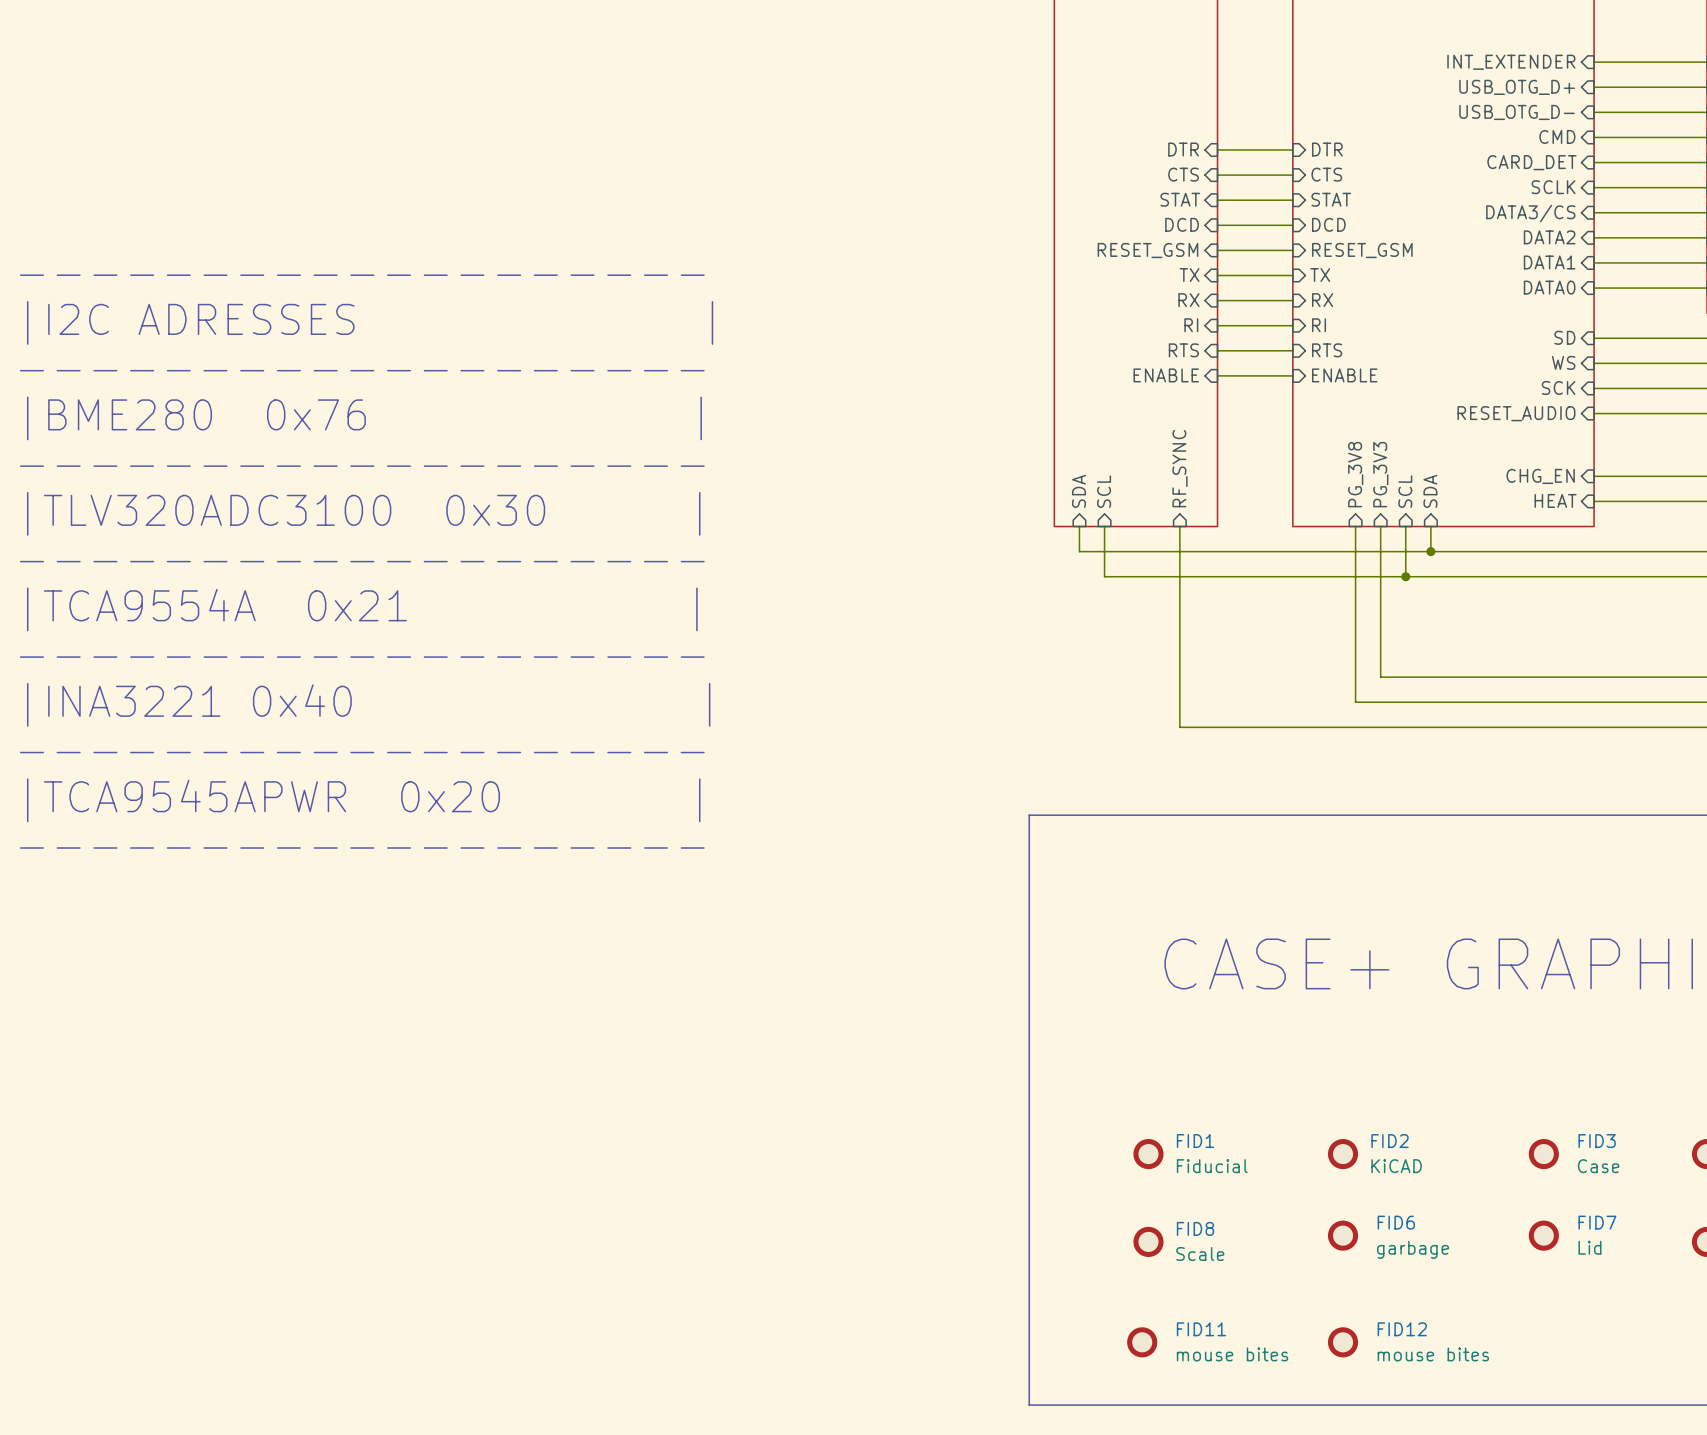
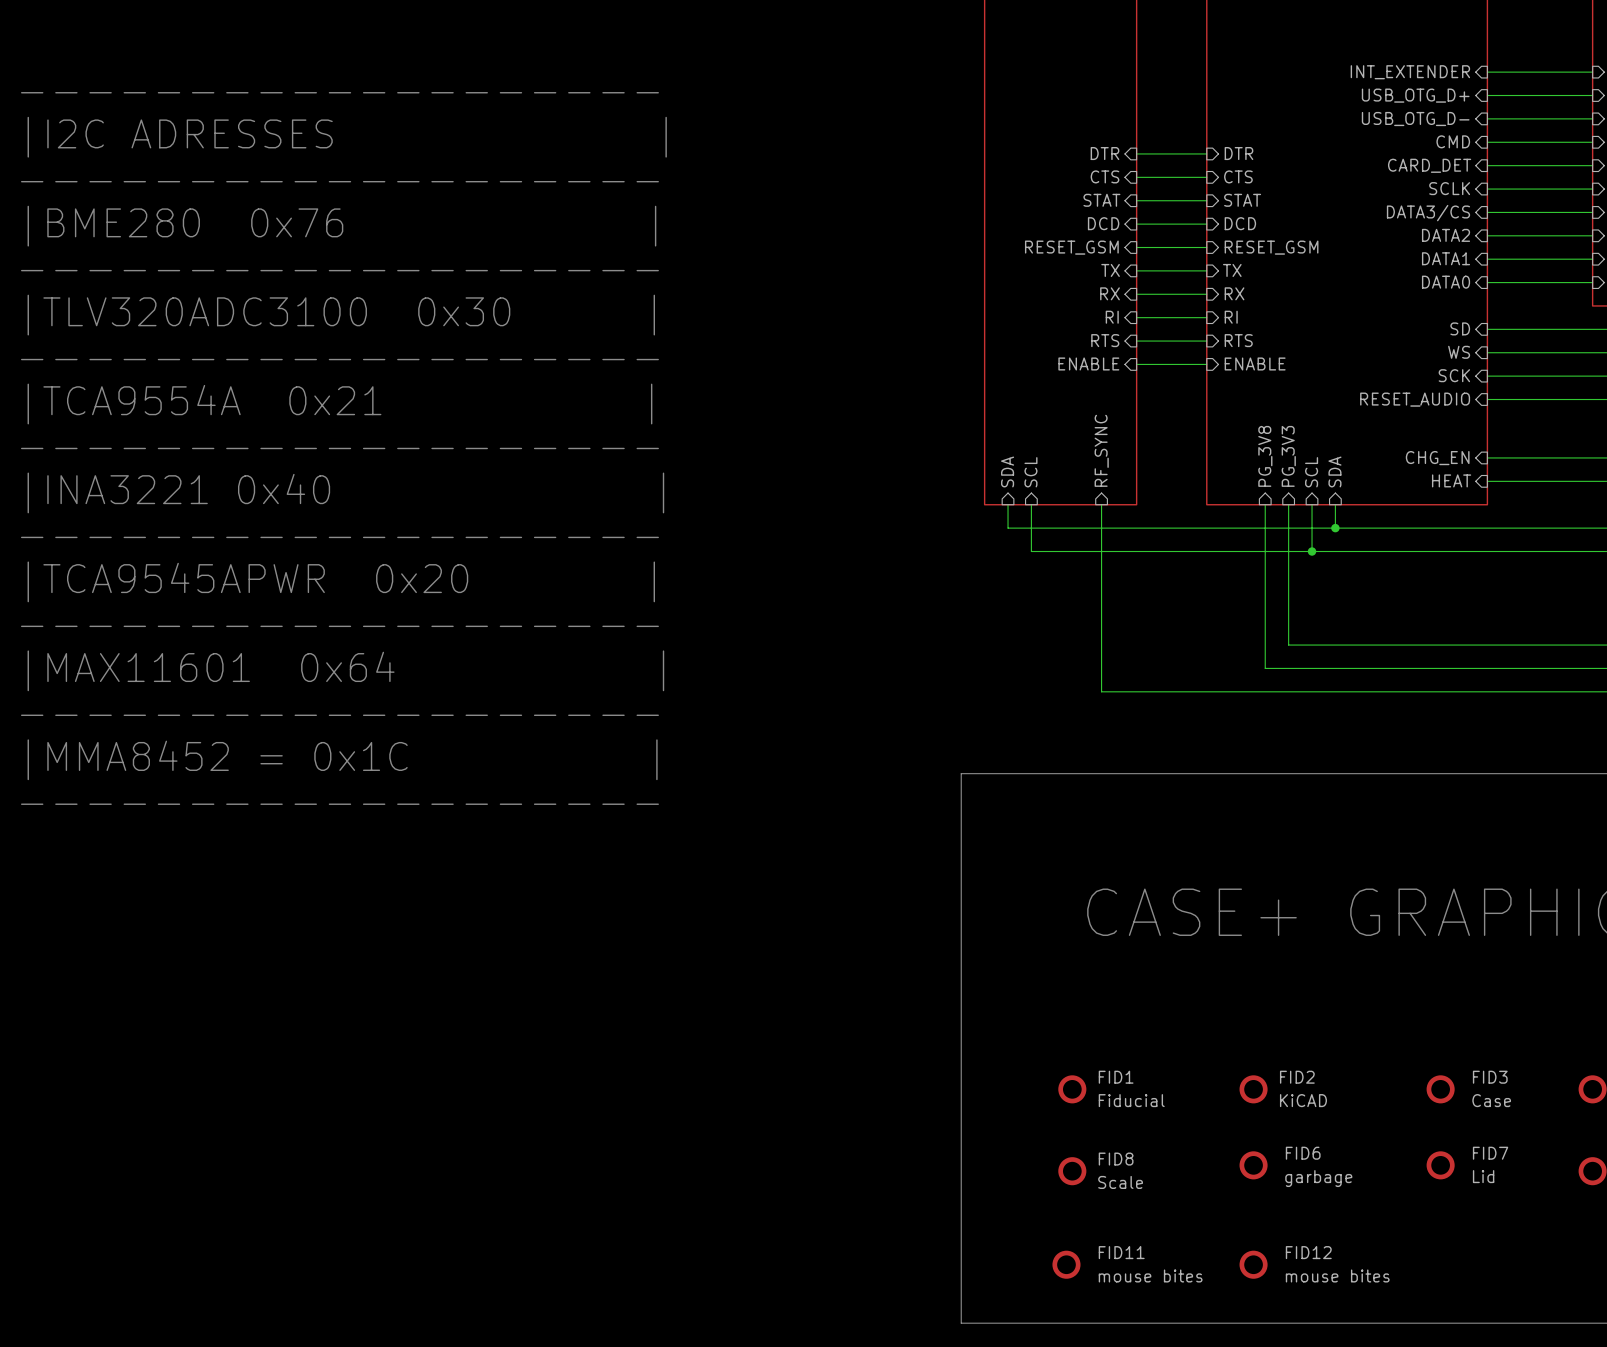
text: none -> ------------------- (339, 92)
text: none -> |I2C ADRESSES | (347, 137)
text: none -> ------------------- (339, 181)
text: none -> |BME280 0x76 | (341, 226)
text: |I2C ADRESSES | (370, 322) -> |TLV320ADC3100 0x30 | (341, 315)
text: |BME280 0x76 | (364, 418) -> |TCA9554A 0x21 | (339, 404)
text: |TLV320ADC3100 0x30 | (363, 513) -> |INA3221 0x40 | (345, 492)
text: |TCA9554A 0x21 | (362, 609) -> |TCA9545APWR 0x20 | (341, 581)
text: |INA3221 0x40 | (368, 704) -> |MAX11601 0x64 | (345, 670)
text: |TCA9545APWR 0x20 | (363, 800) -> |MMA8452 = 0x1C | (342, 759)

